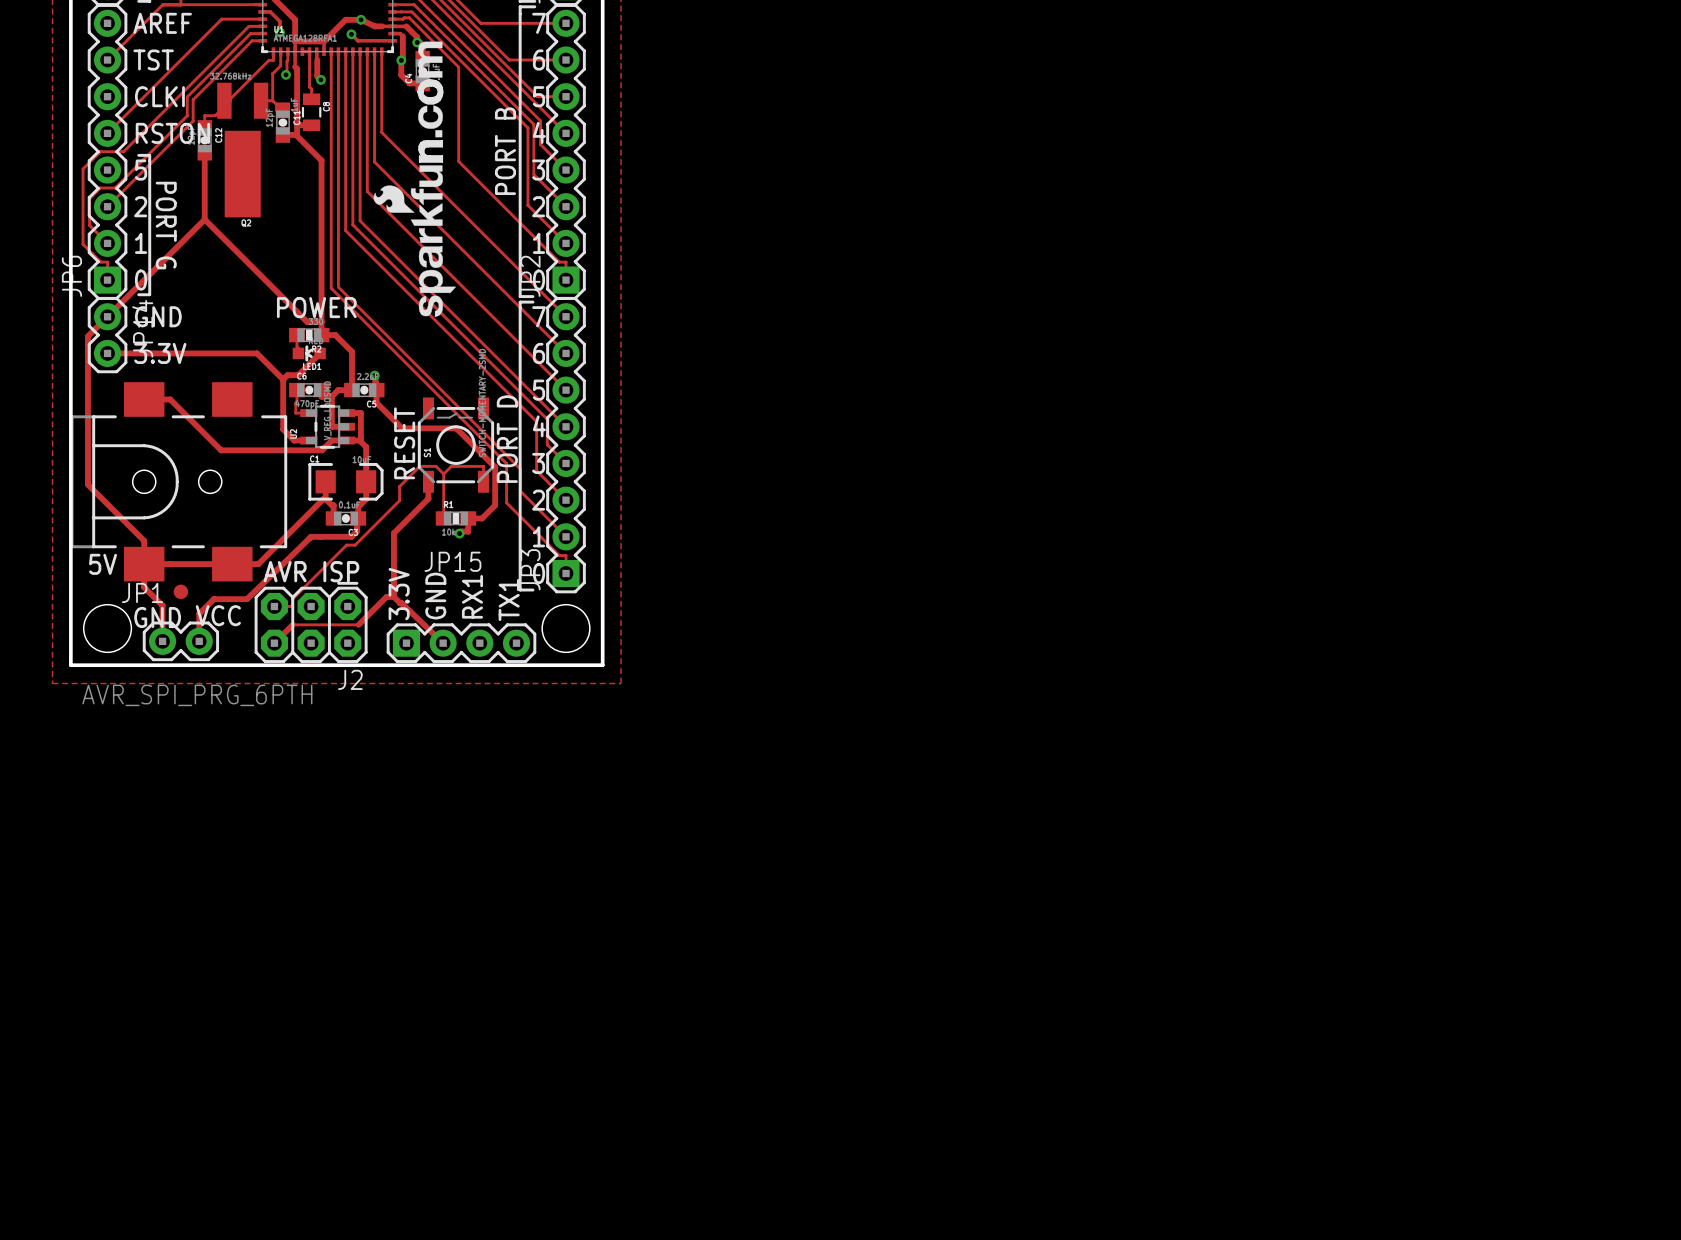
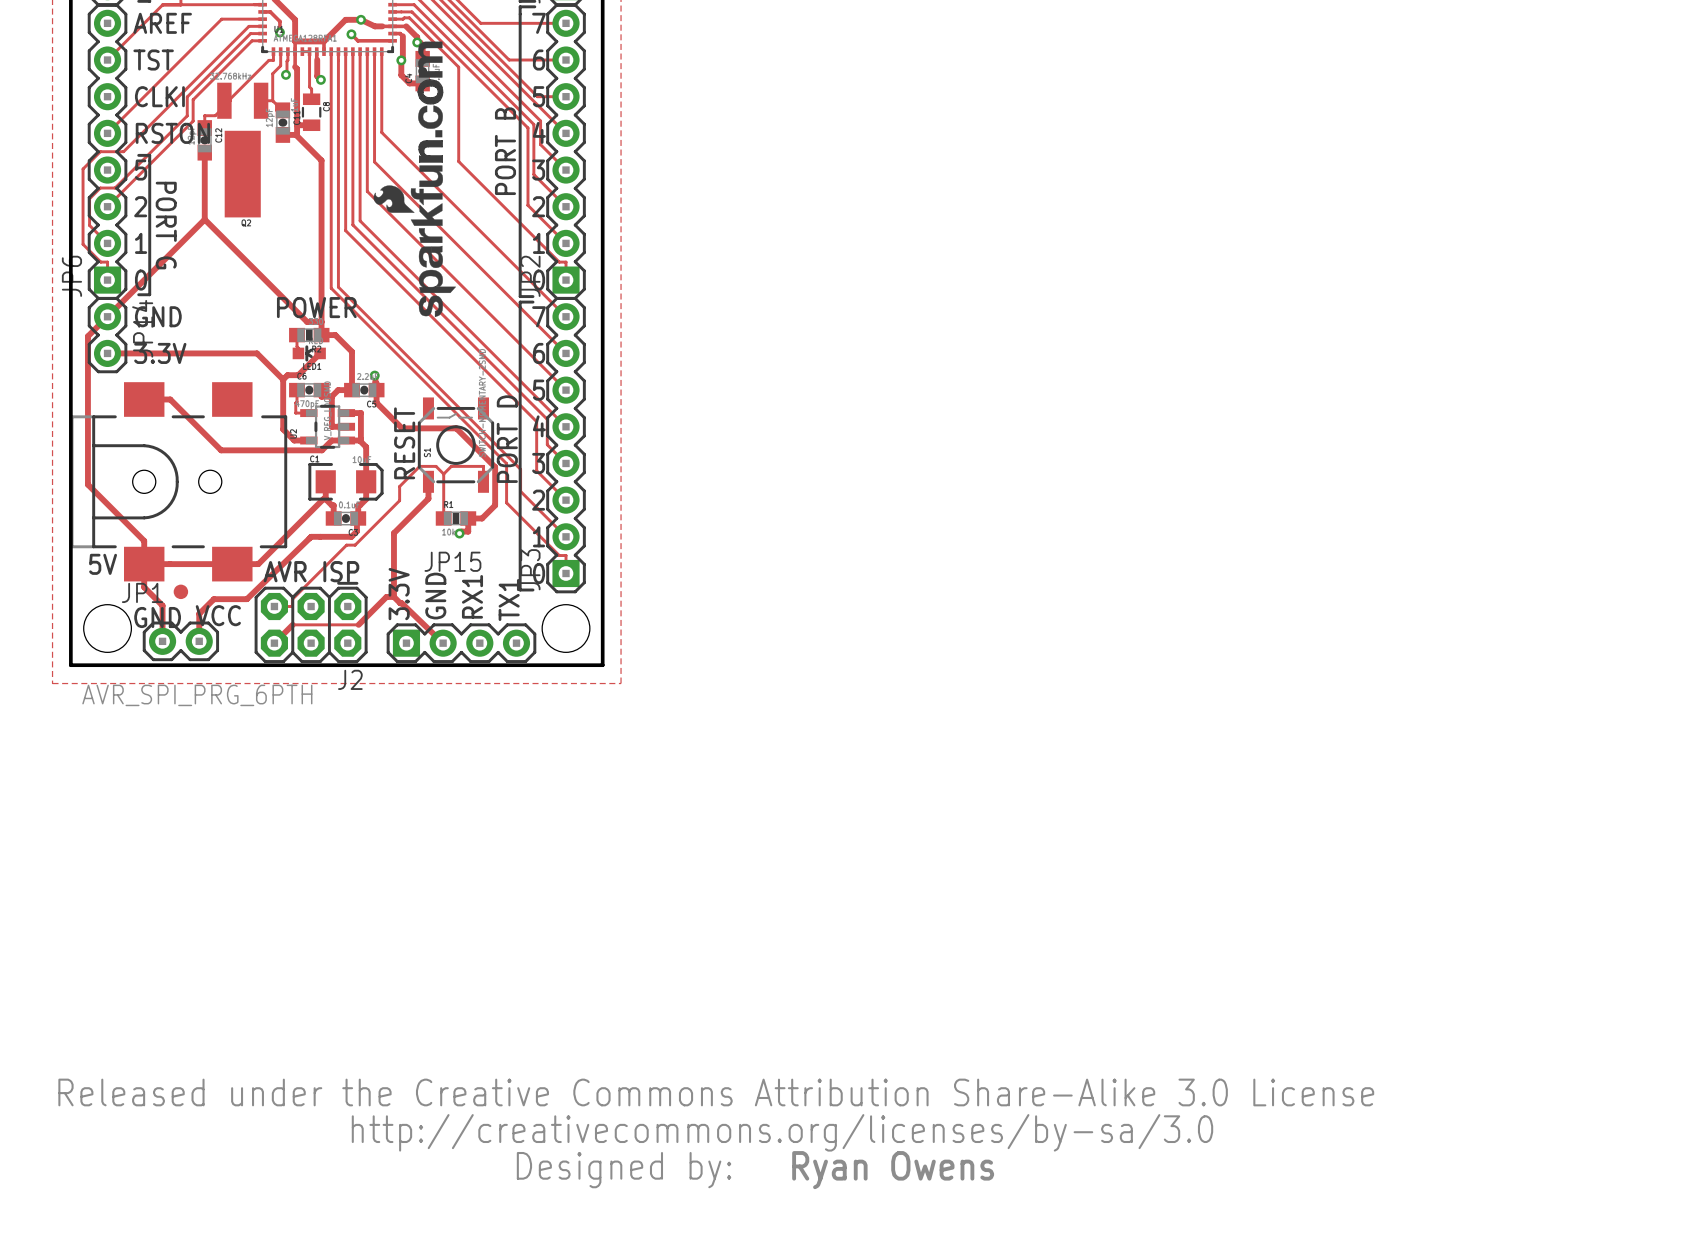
drawing: none -> [58, 1078, 1375, 1189]
text: none -> Ryan Owens (893, 1170)

